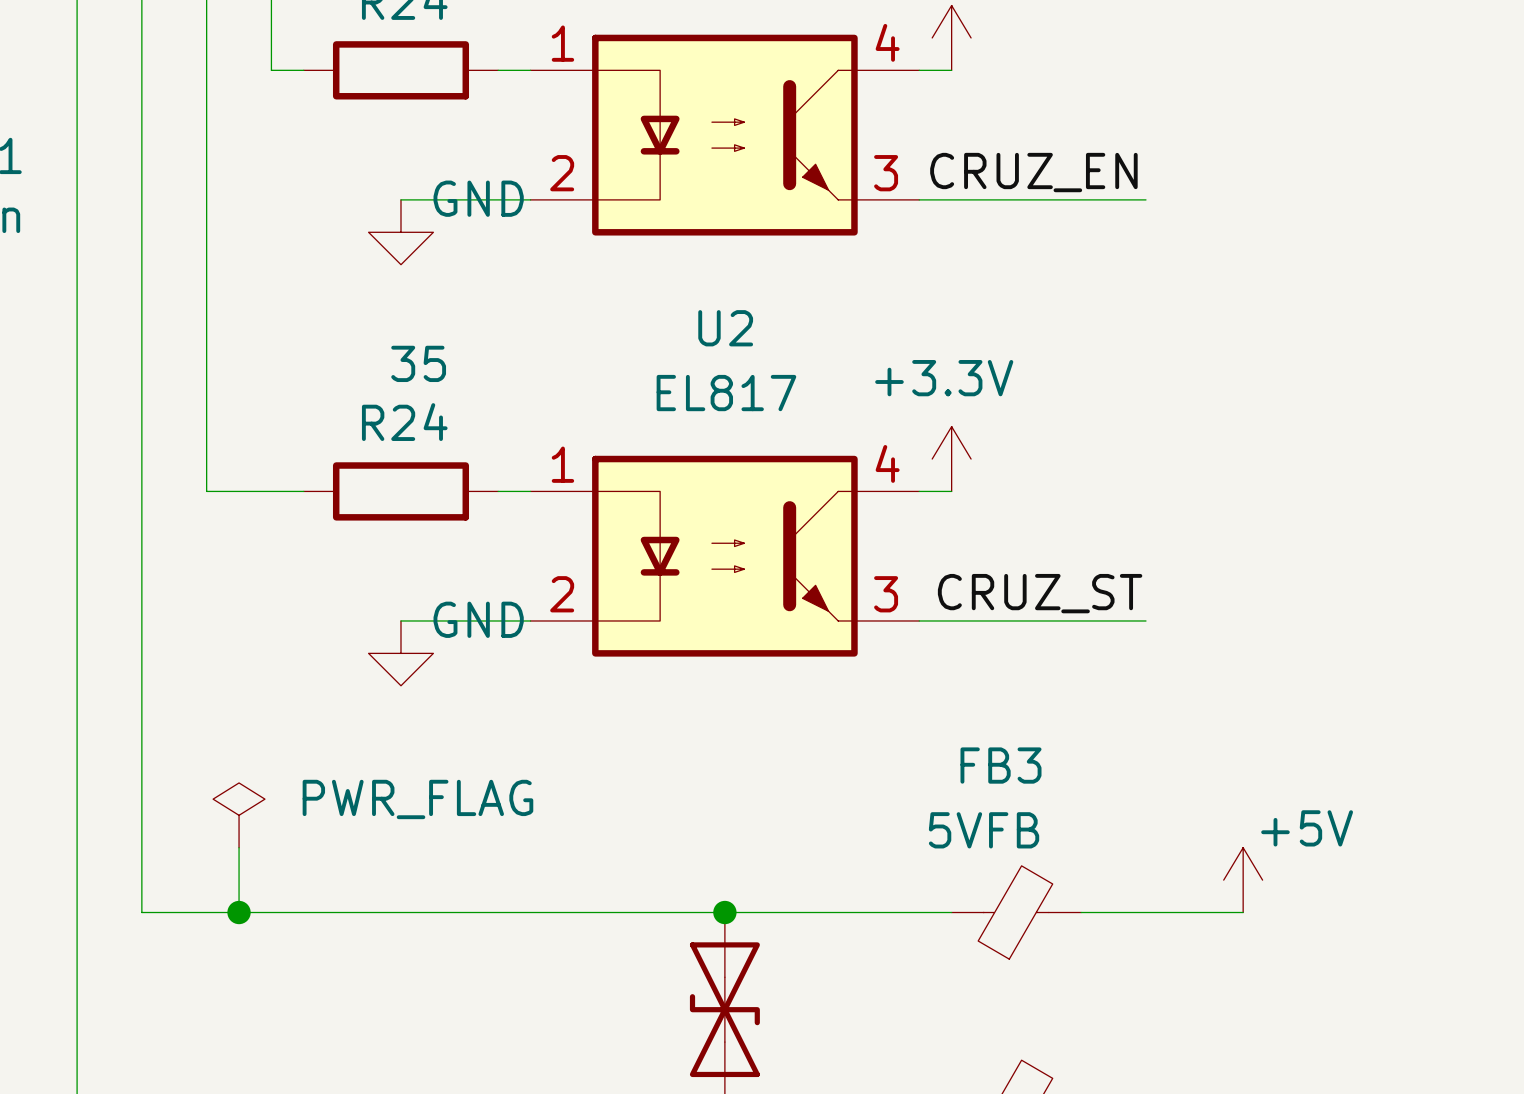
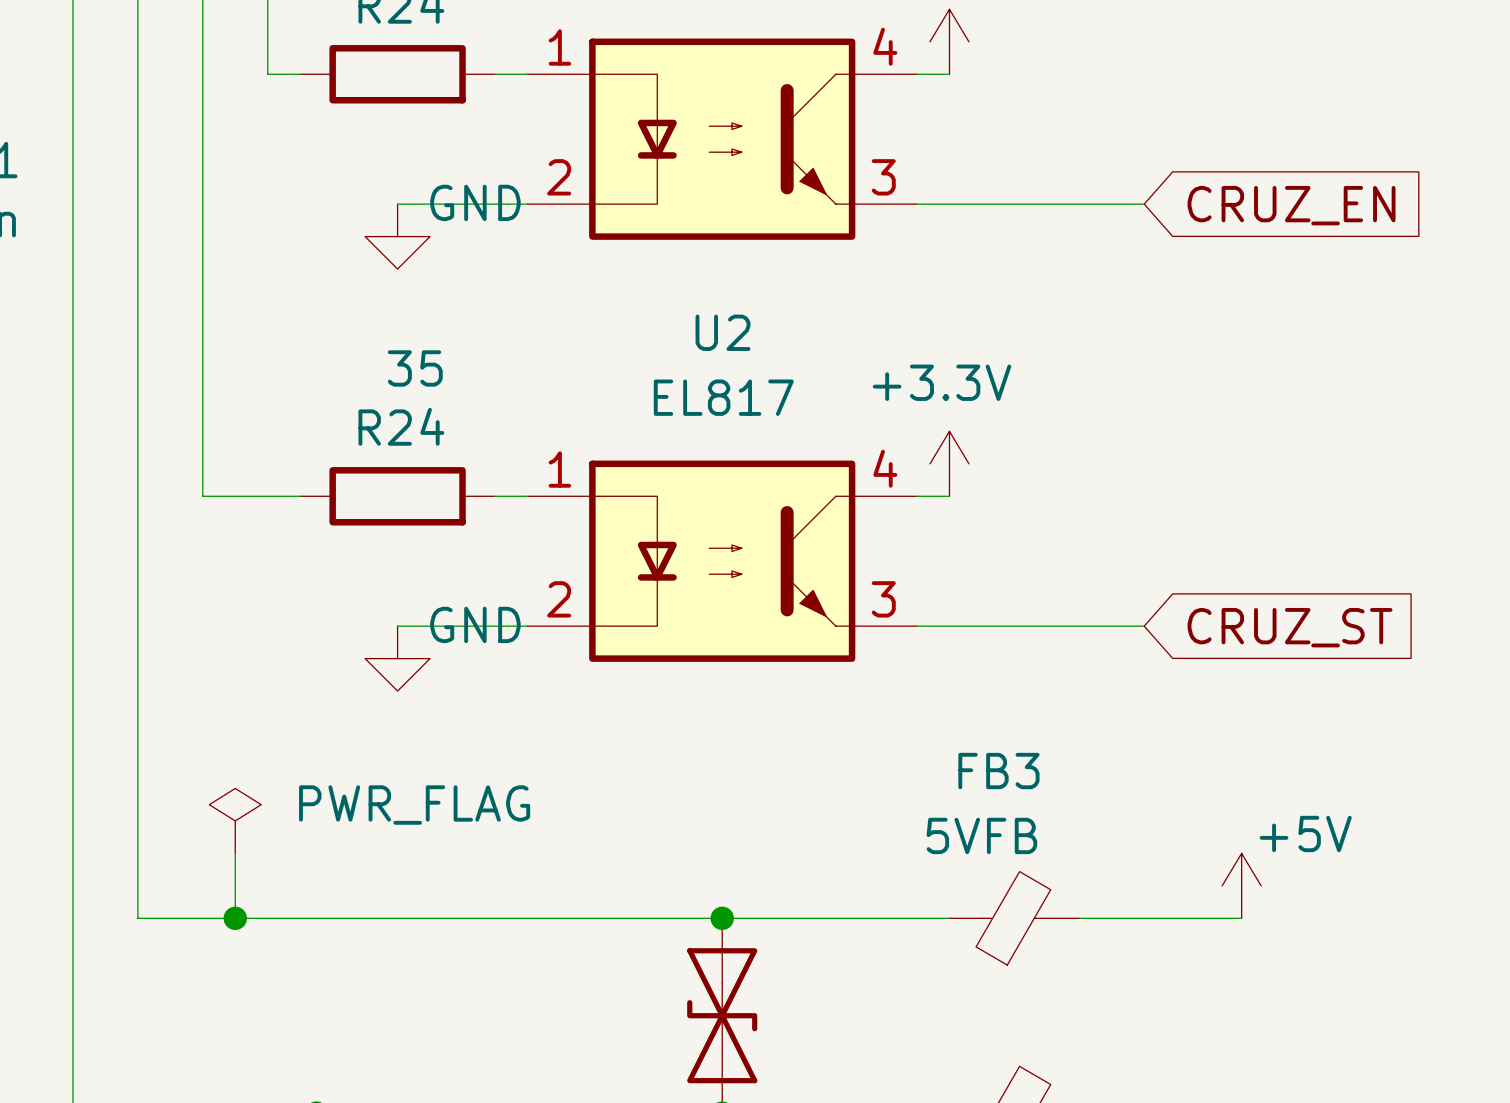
label: CRUZ_EN (1033, 172) -> none
global label: none -> CRUZ_EN (1291, 205)
label: CRUZ_ST (1040, 593) -> none
global label: none -> CRUZ_ST (1290, 627)

